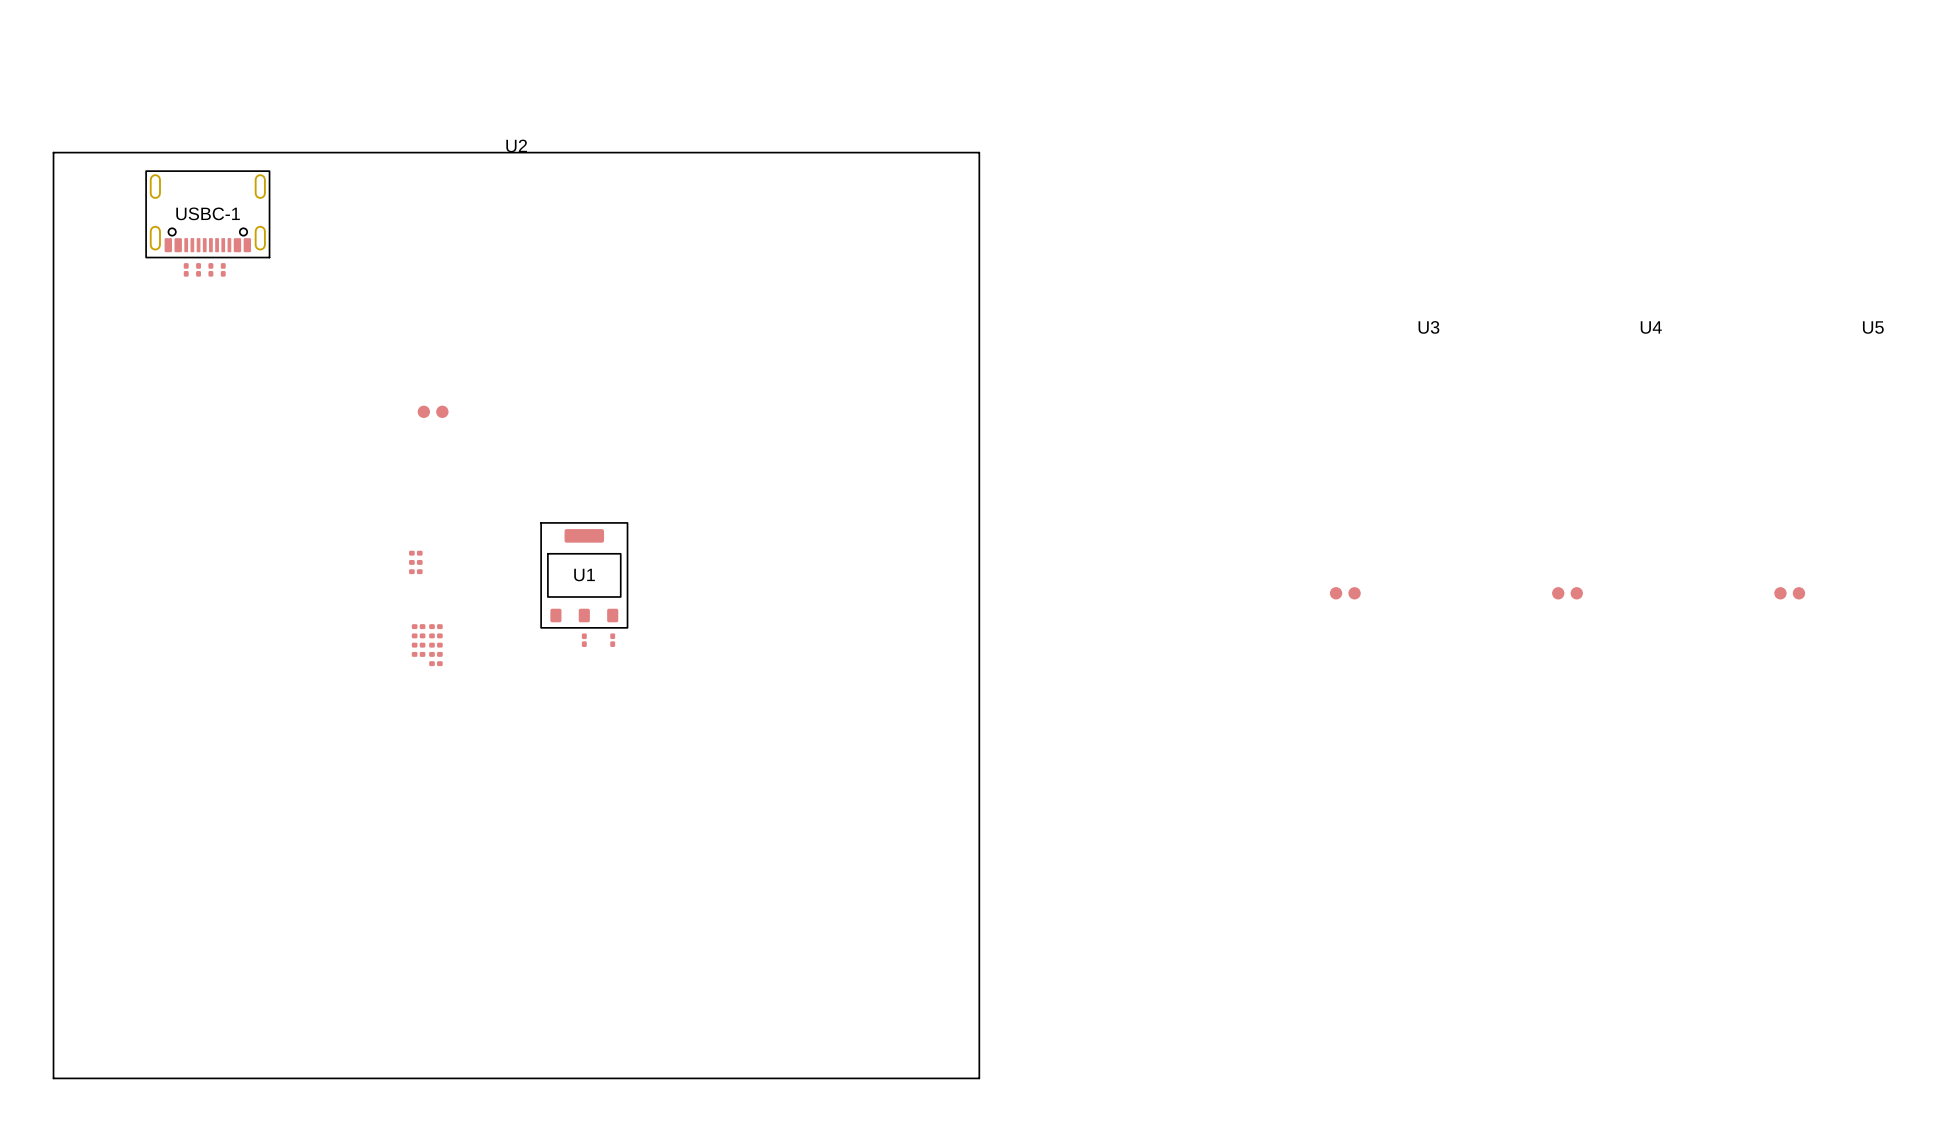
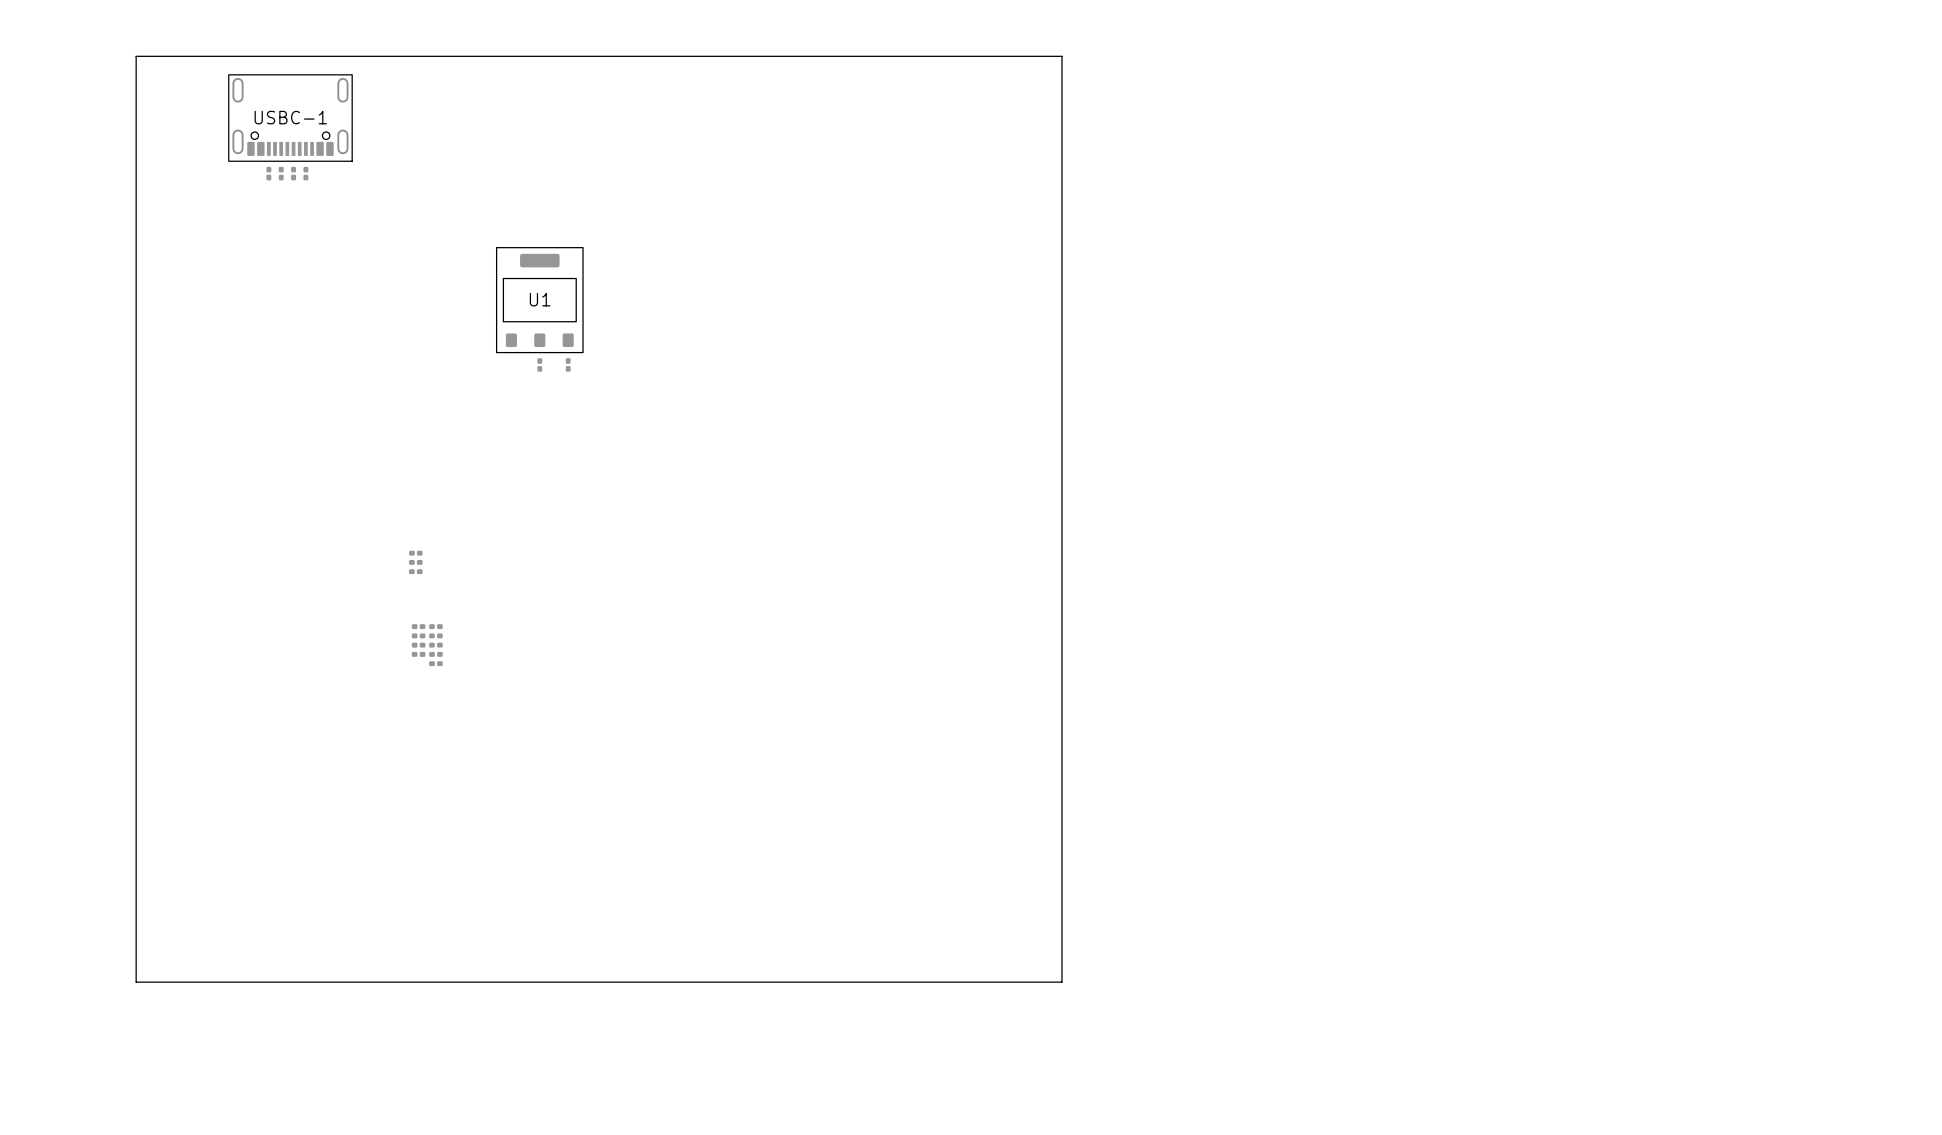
board edge: (53, 152) (979, 152) (979, 1078) (53, 1078) (53, 152) -> (136, 56) (1061, 56) (1061, 982) (136, 982) (136, 56)
part: none -> (268, 173)
part: none -> (281, 173)
part: none -> (293, 173)
part: none -> (305, 173)
USBC-1 position: (207, 214) -> (290, 118)
part: (186, 269) -> none
part: (198, 269) -> none
part: (210, 269) -> none
part: (223, 269) -> none
part: none -> (539, 364)
part: none -> (568, 364)
U2: (433, 411) -> none
U1 position: (584, 575) -> (539, 300)
U3: (1345, 593) -> none
U4: (1567, 593) -> none
U5: (1789, 593) -> none
part: (584, 640) -> none
part: (612, 640) -> none

